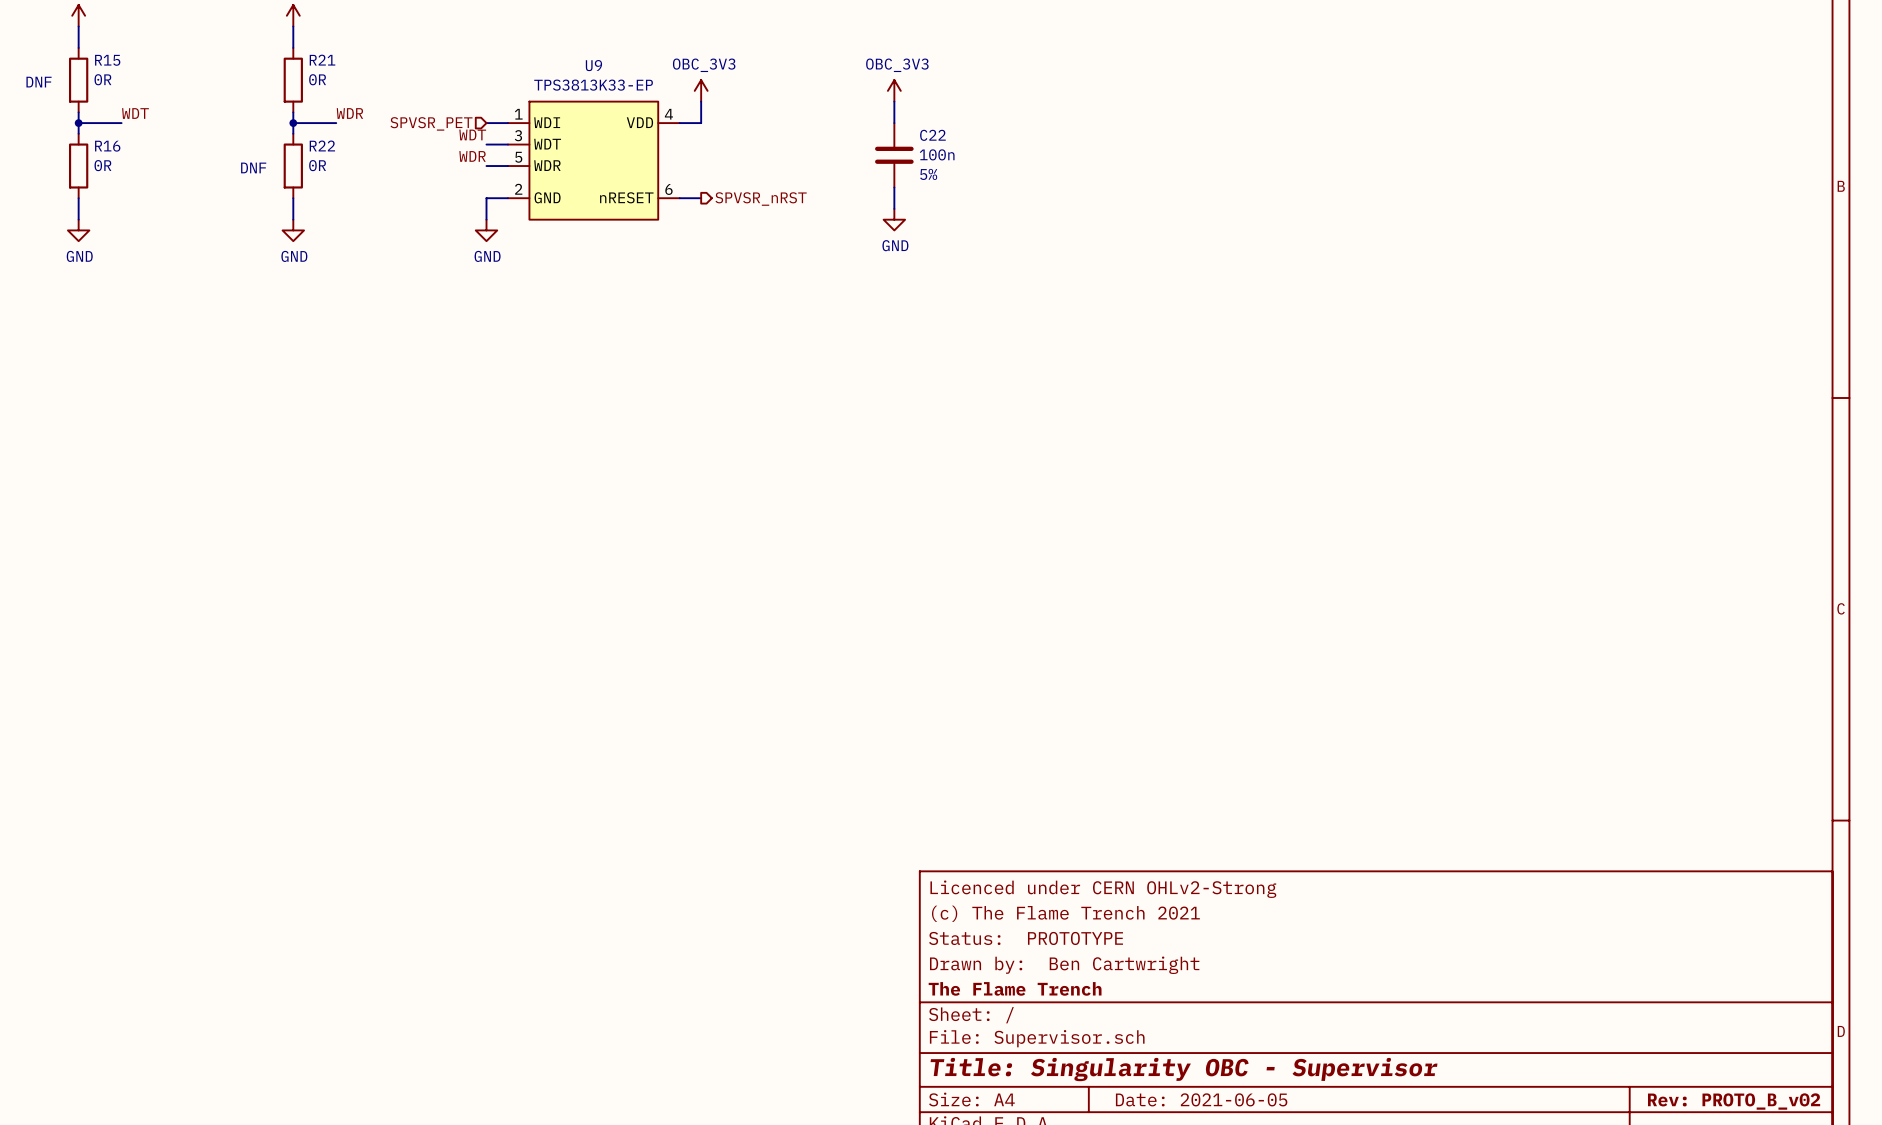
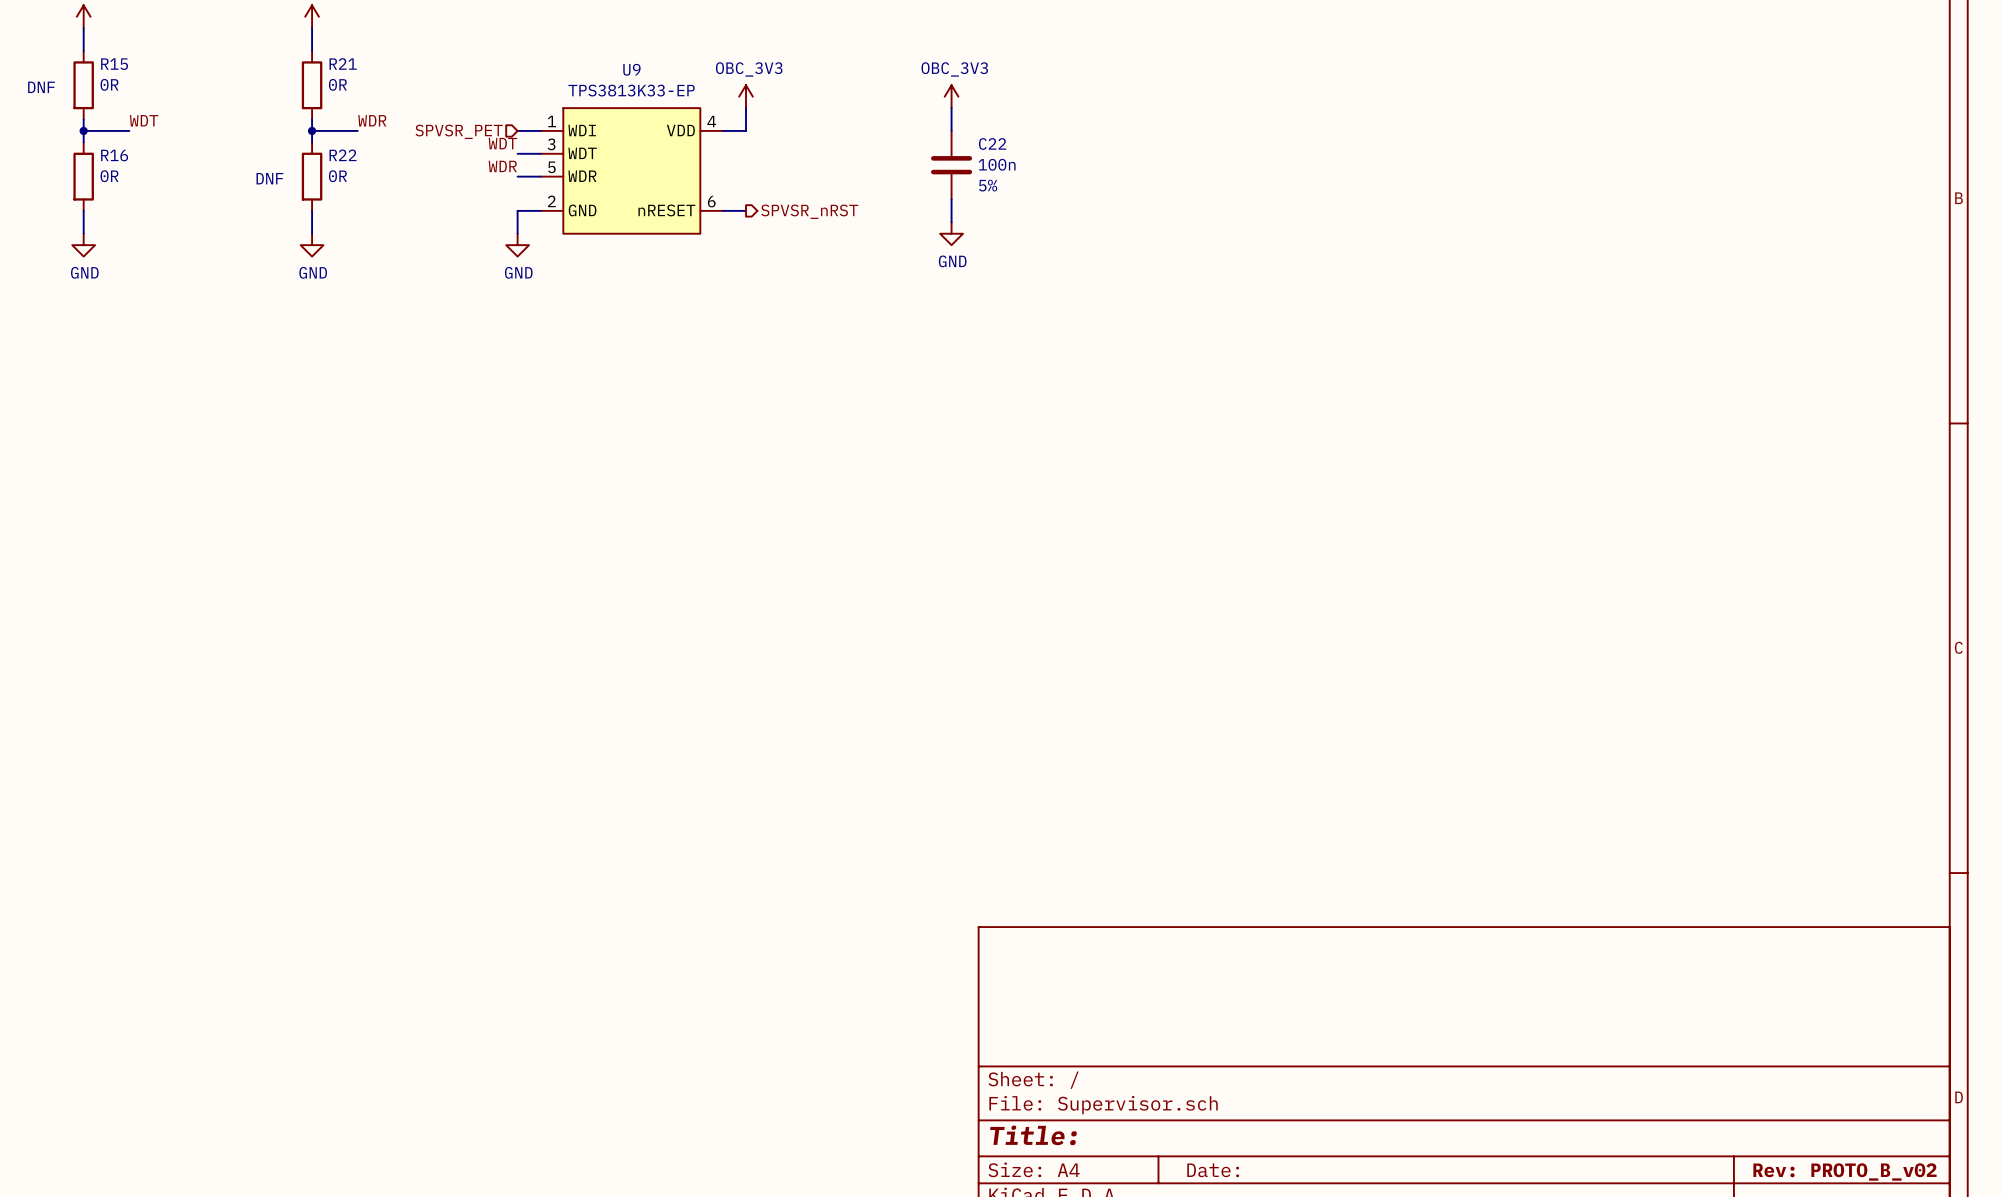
title block: Licenced under CERN OHLv2-Strong (1103, 889) -> none
title block: (c) The Flame Trench 2021 (1065, 913) -> none
title block: Status: PROTOTYPE (1026, 938) -> none
title block: Drawn by: Ben Cartwright (1064, 965) -> none
title block: The Flame Trench (1015, 988) -> none
title block: Title: Singularity OBC - Supervisor (1184, 1069) -> Title: (1033, 1135)
title block: Date: 2021-06-05 (1201, 1099) -> Date: (1213, 1170)

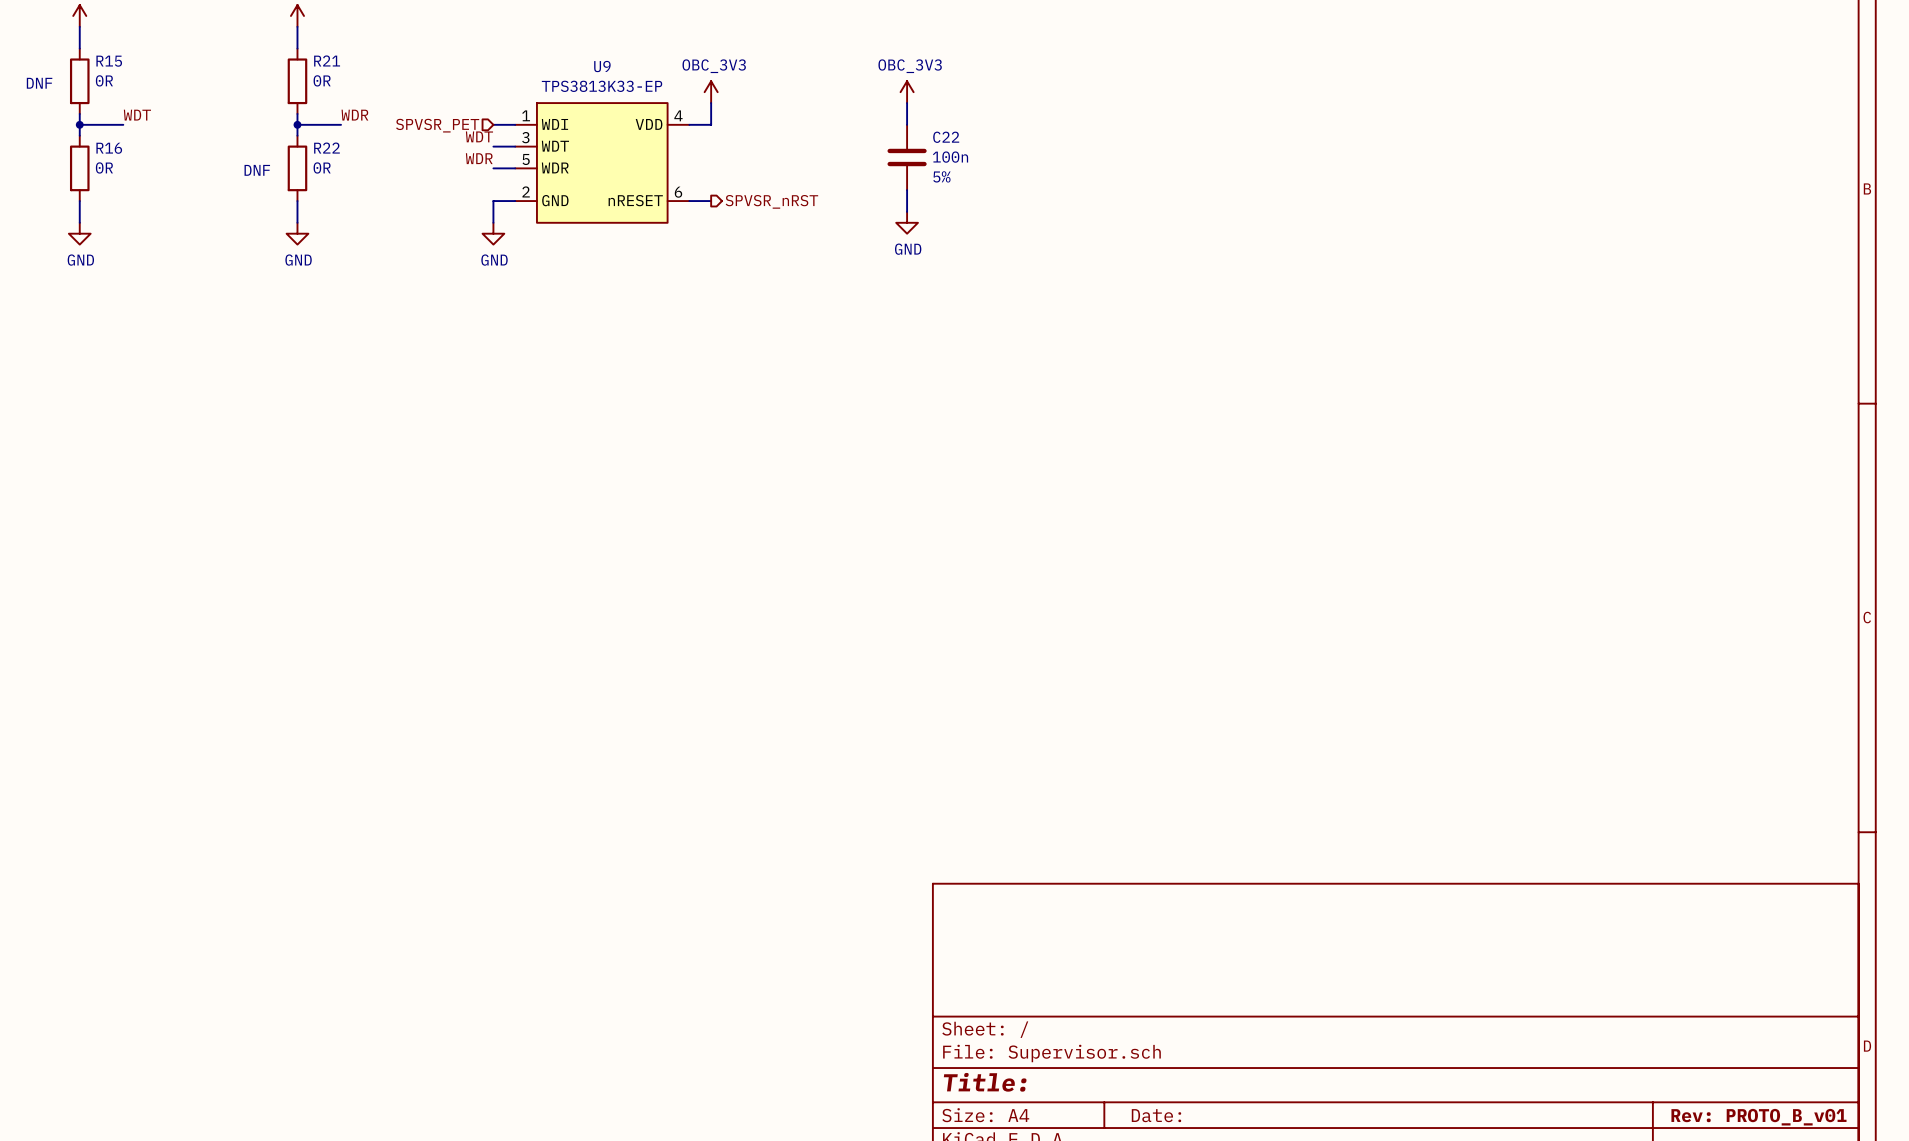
title block: Rev: PROTO_B_v02 (1844, 1171) -> Rev: PROTO_B_v01 (1758, 1117)

